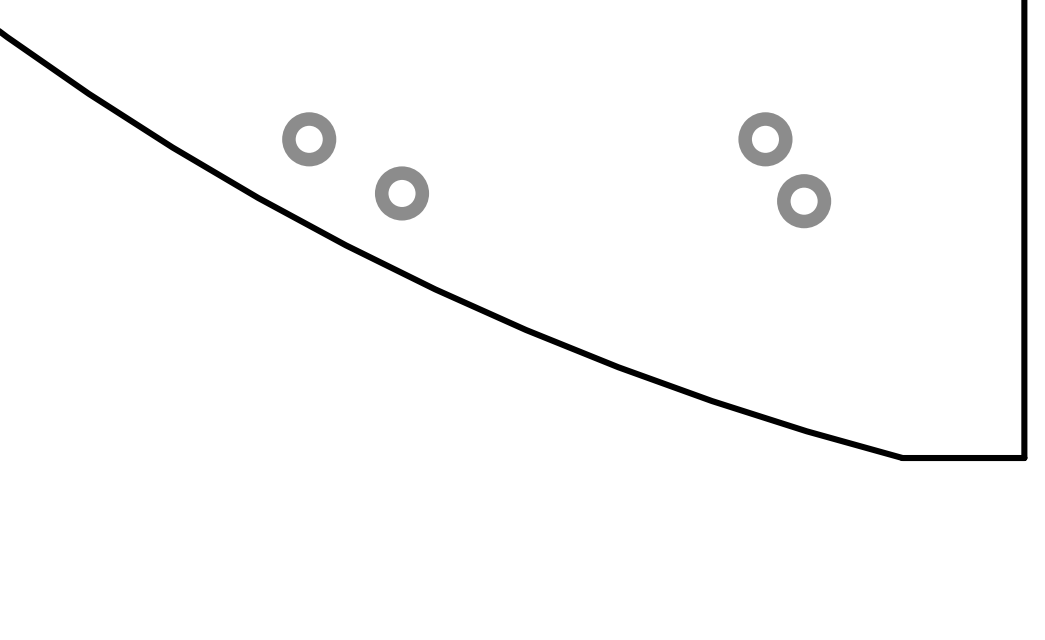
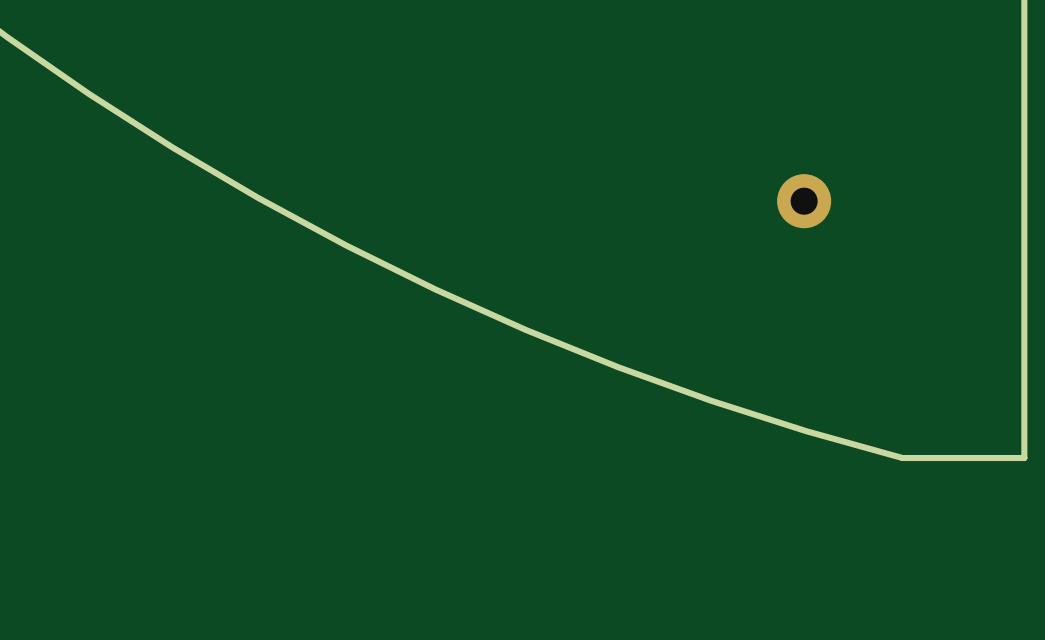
via: (309, 139) -> none
via: (765, 139) -> none
via: (402, 193) -> none

